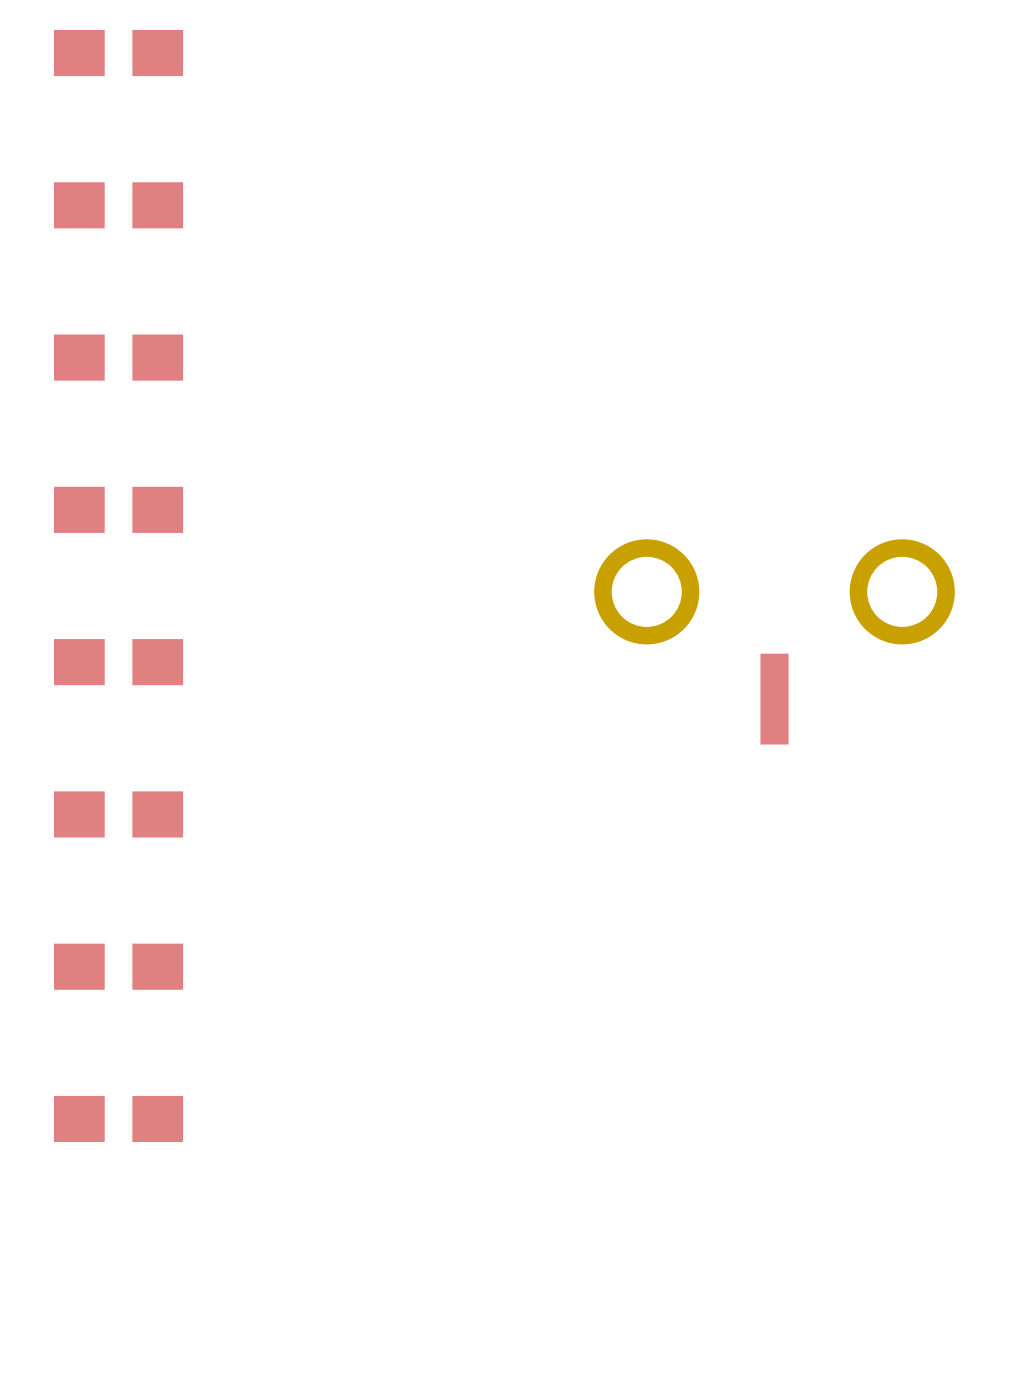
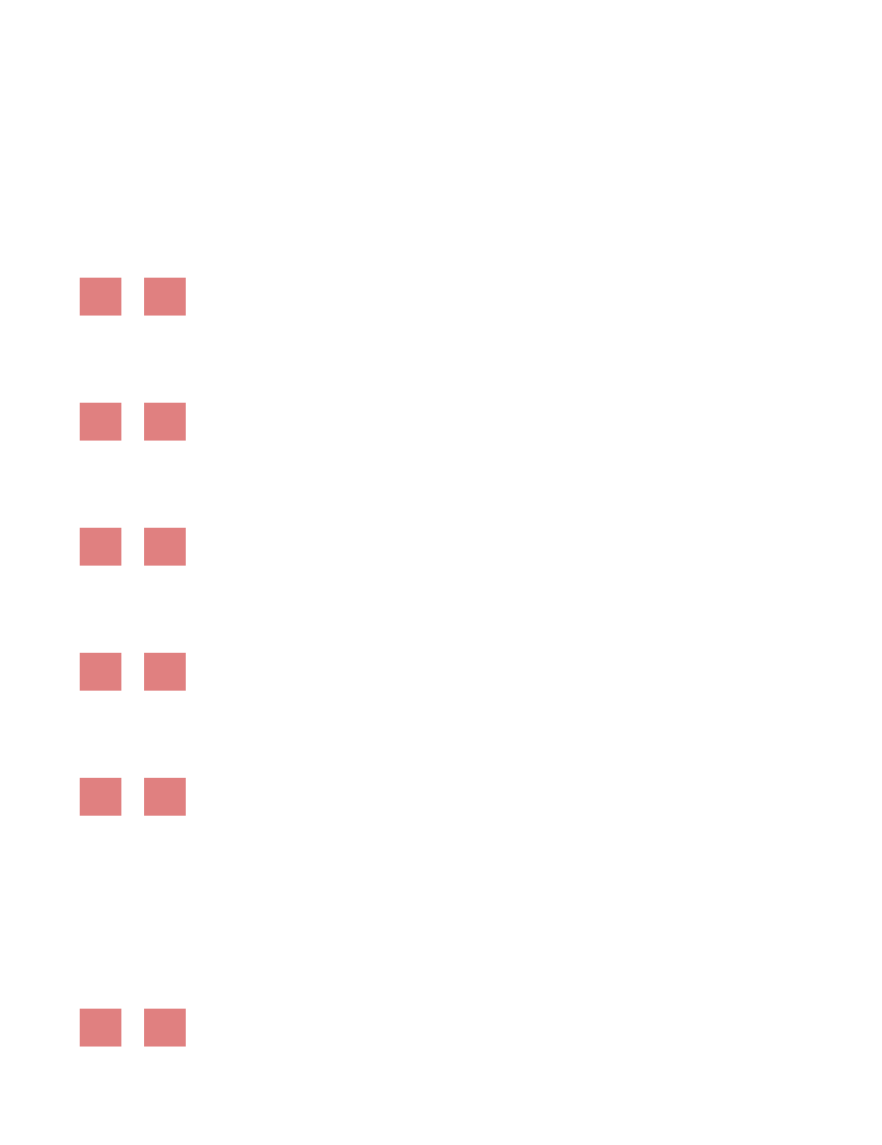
part: (118, 53) -> none
part: (118, 205) -> none
part: (774, 641) -> none
part position: (118, 1118) -> (132, 1027)

